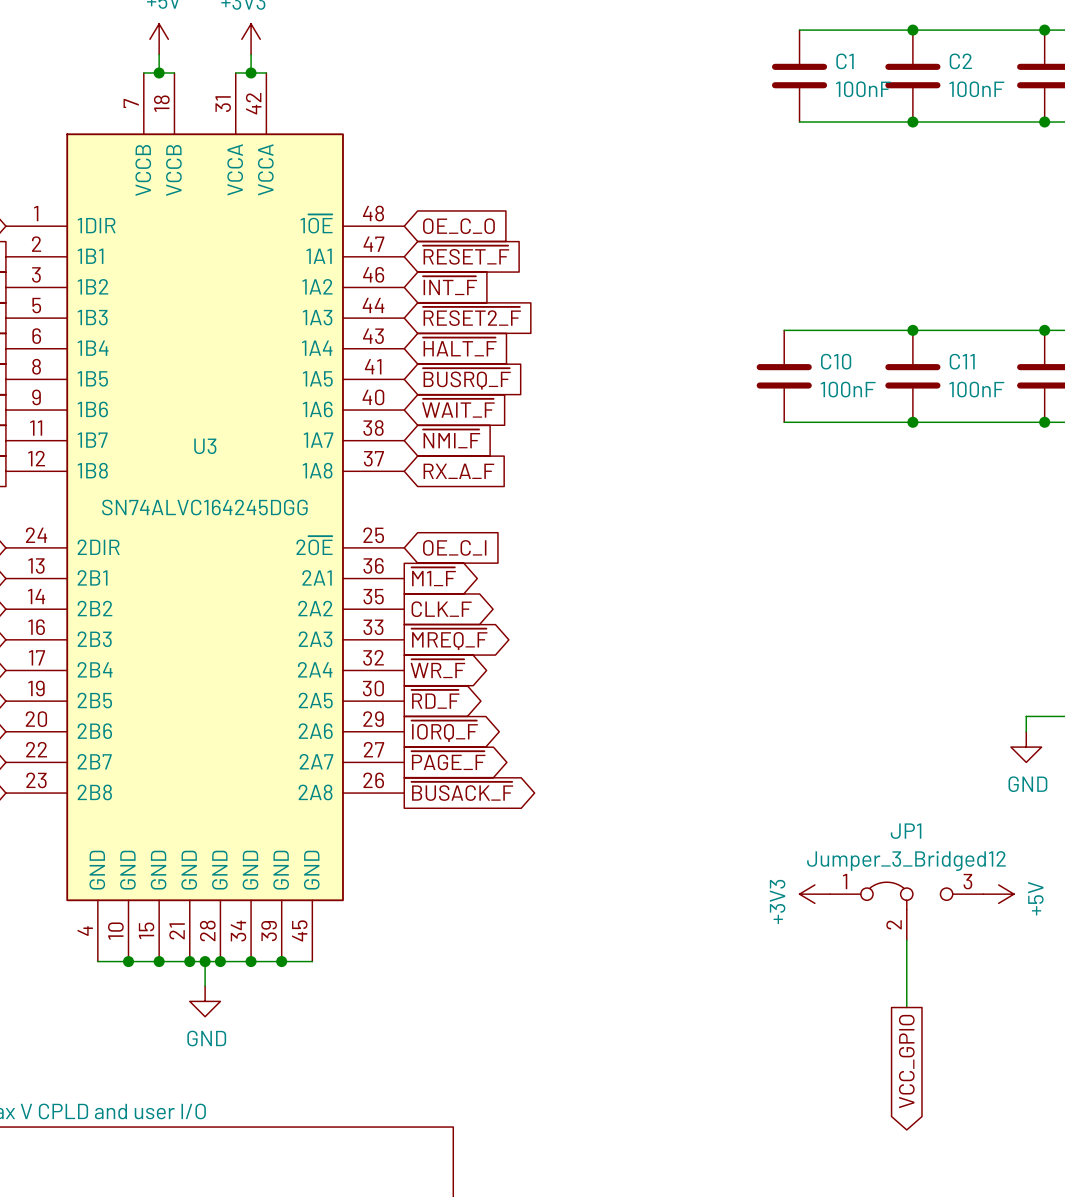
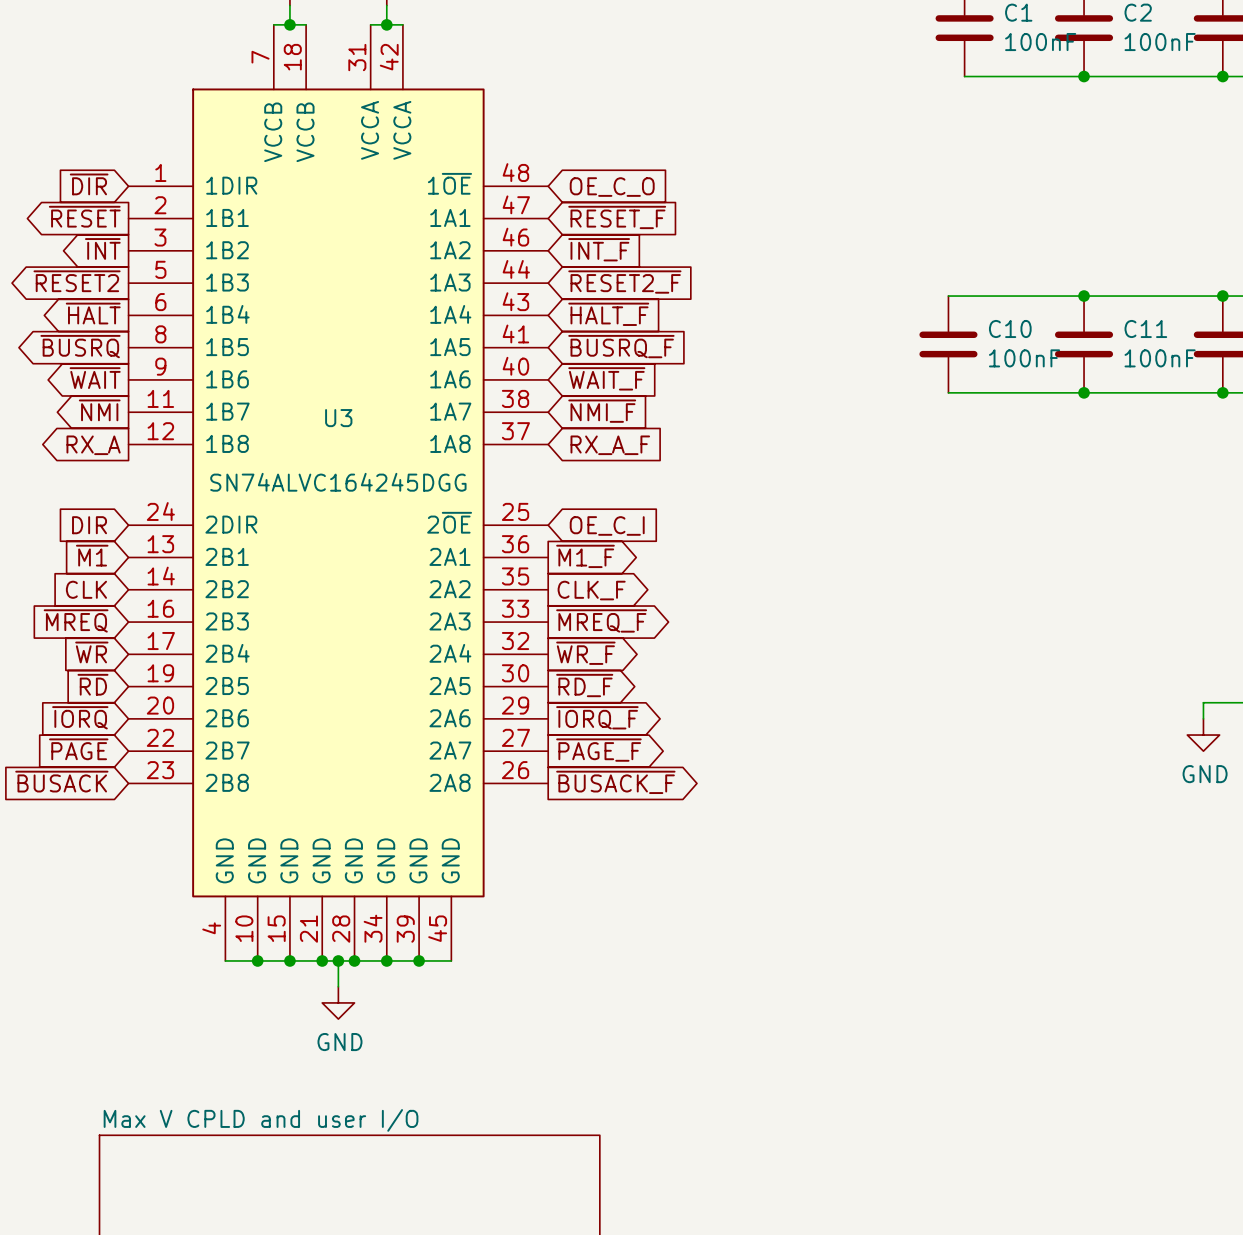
power symbol: +3V3 (814, 894) -> none
power symbol: +5V (998, 894) -> none
JP1: Jumper_3_Bridged12 (906, 911) -> none
wire: (906, 940) (906, 1007) -> none
global label: VCC_GPIO (906, 1061) -> none

